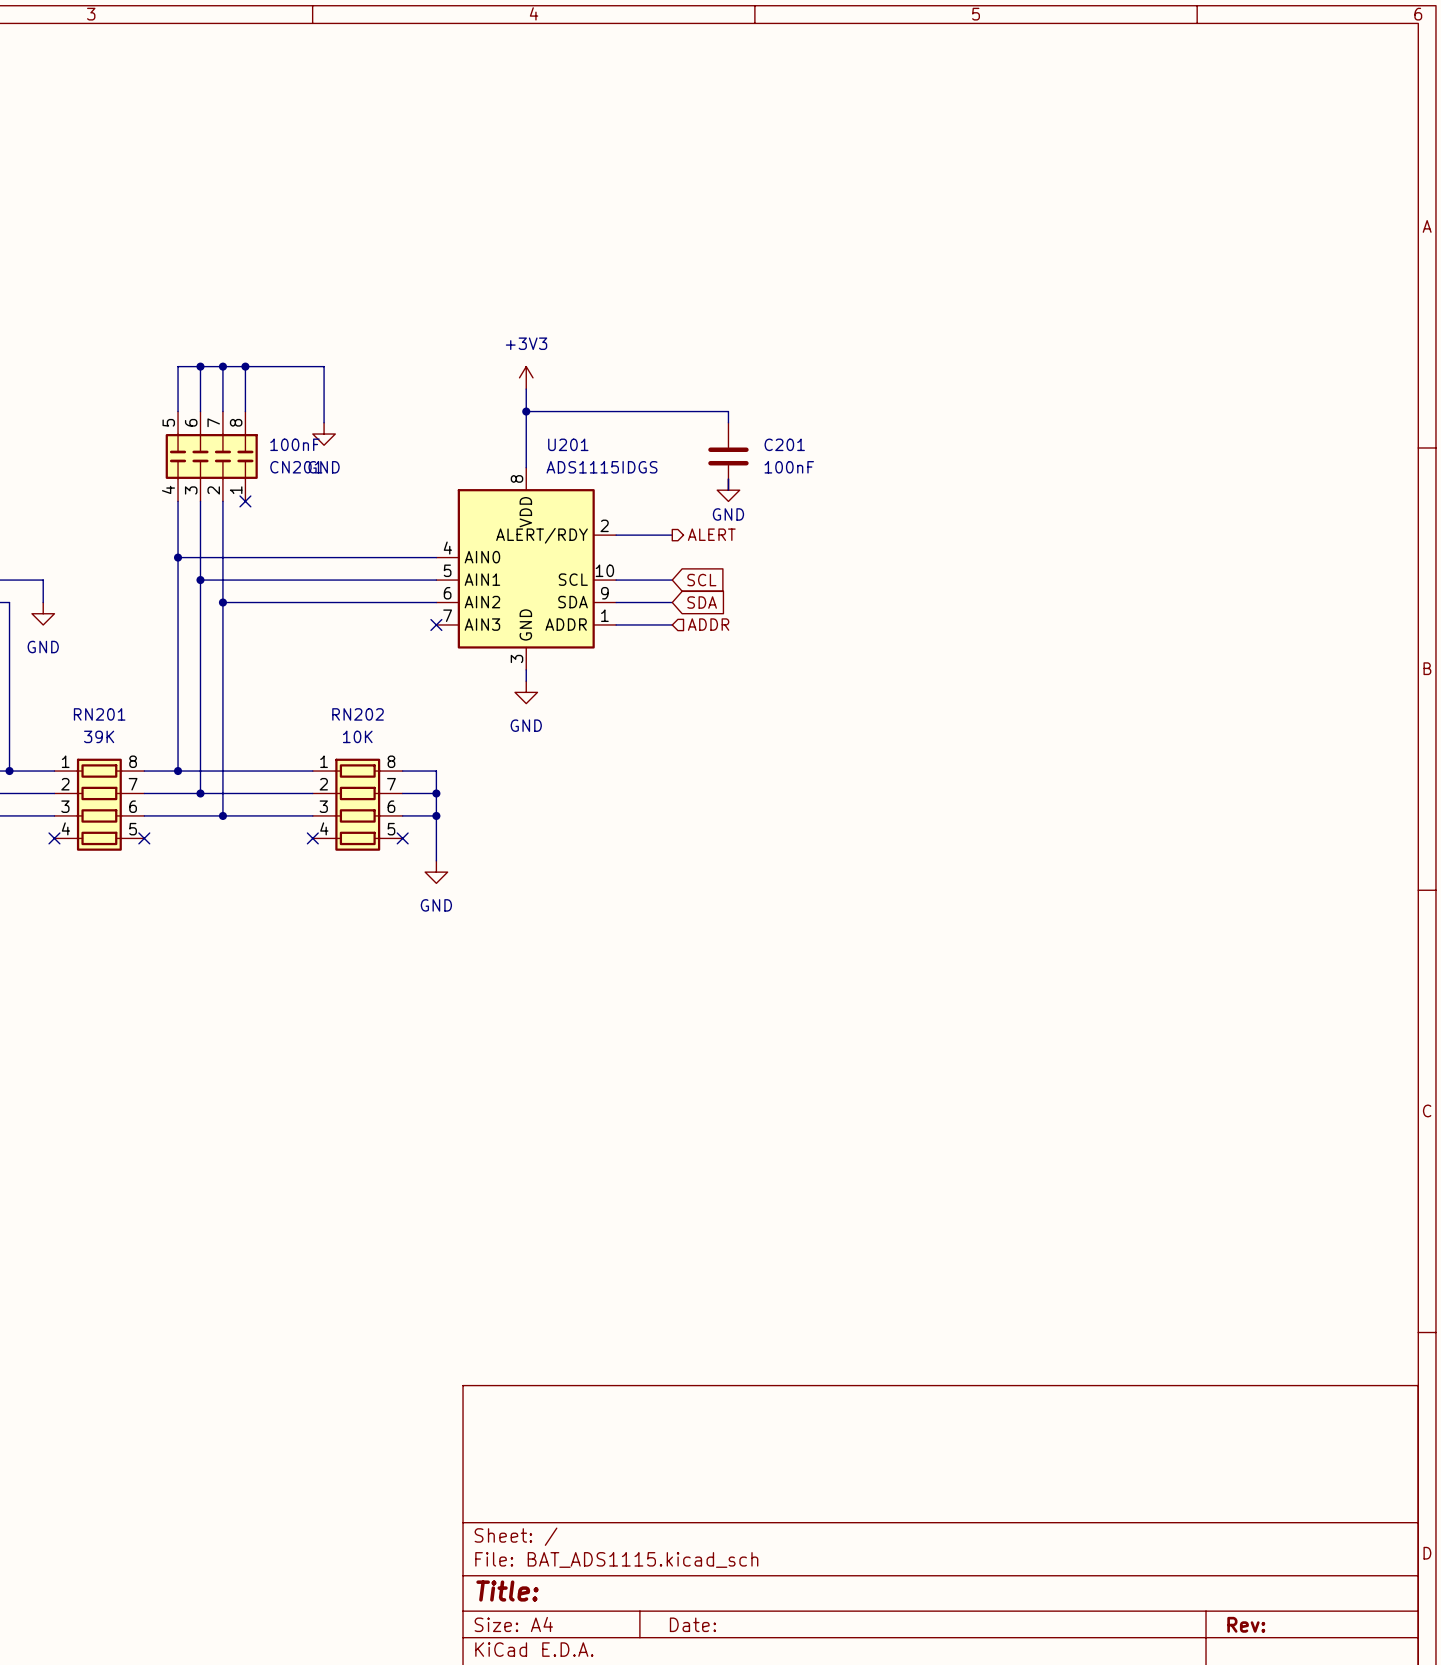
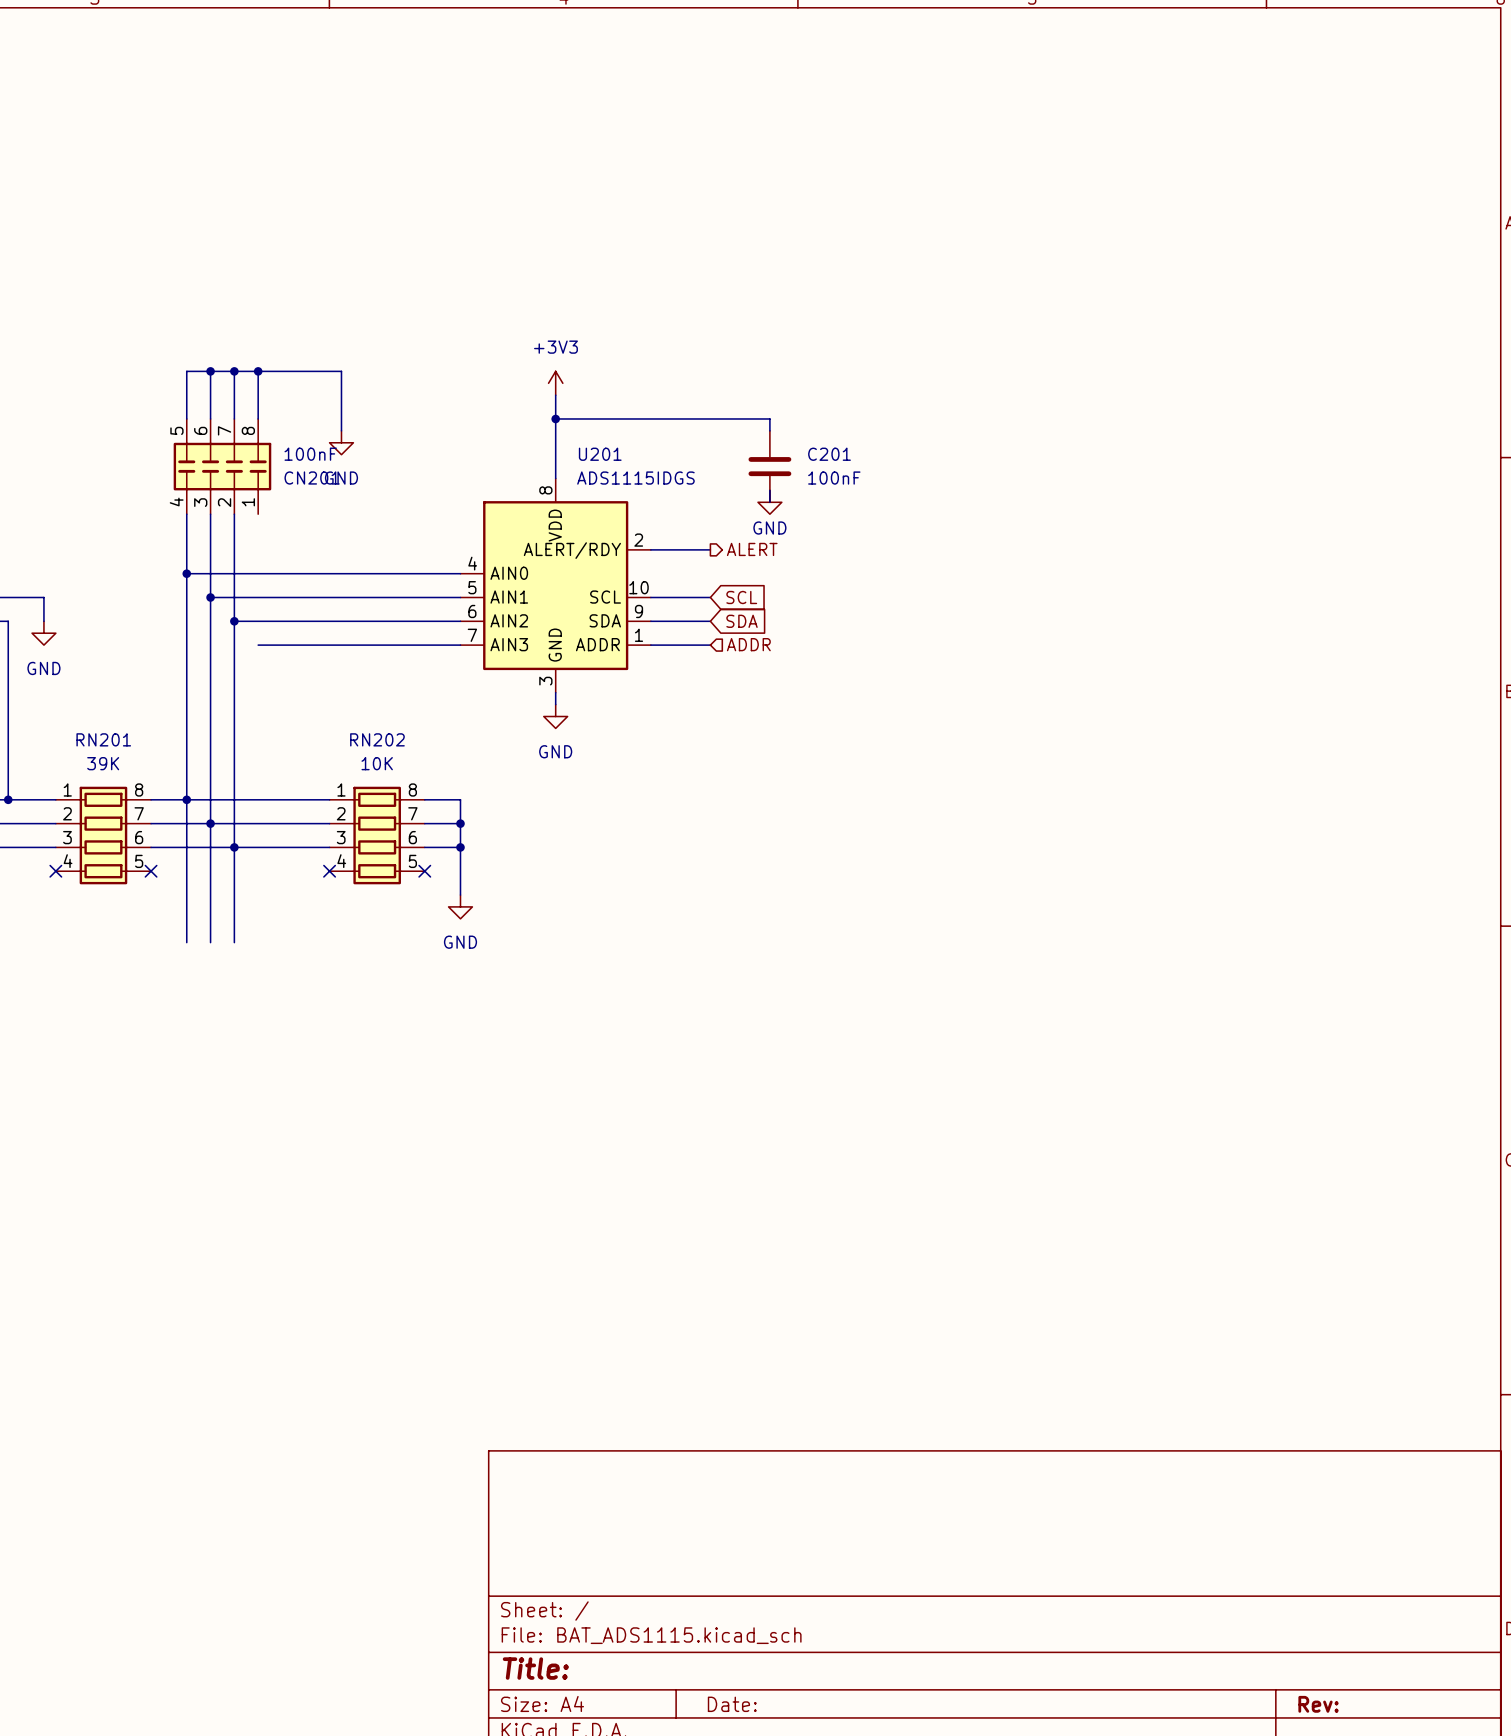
no-connect mark: (245, 501) -> none
wire: none -> (258, 645) (460, 645)
no-connect mark: (436, 624) -> none
wire: none -> (186, 799) (186, 942)
wire: none -> (210, 823) (210, 942)
wire: none -> (234, 847) (234, 942)

